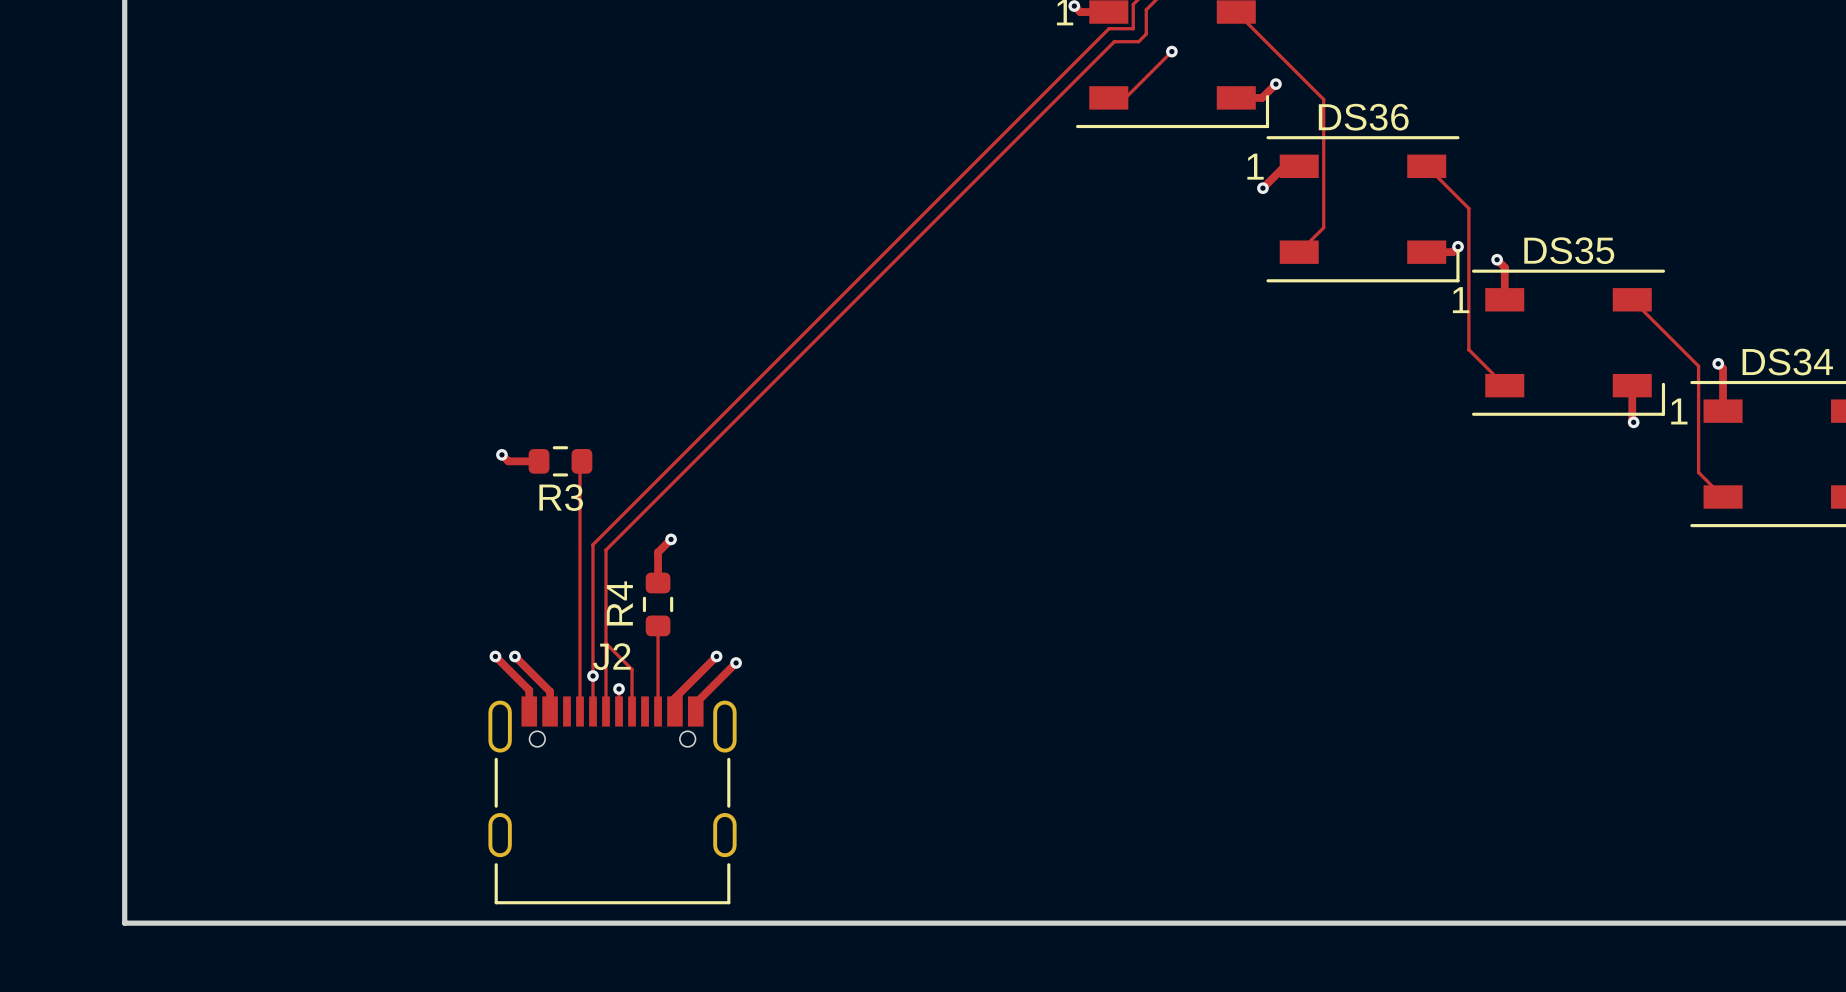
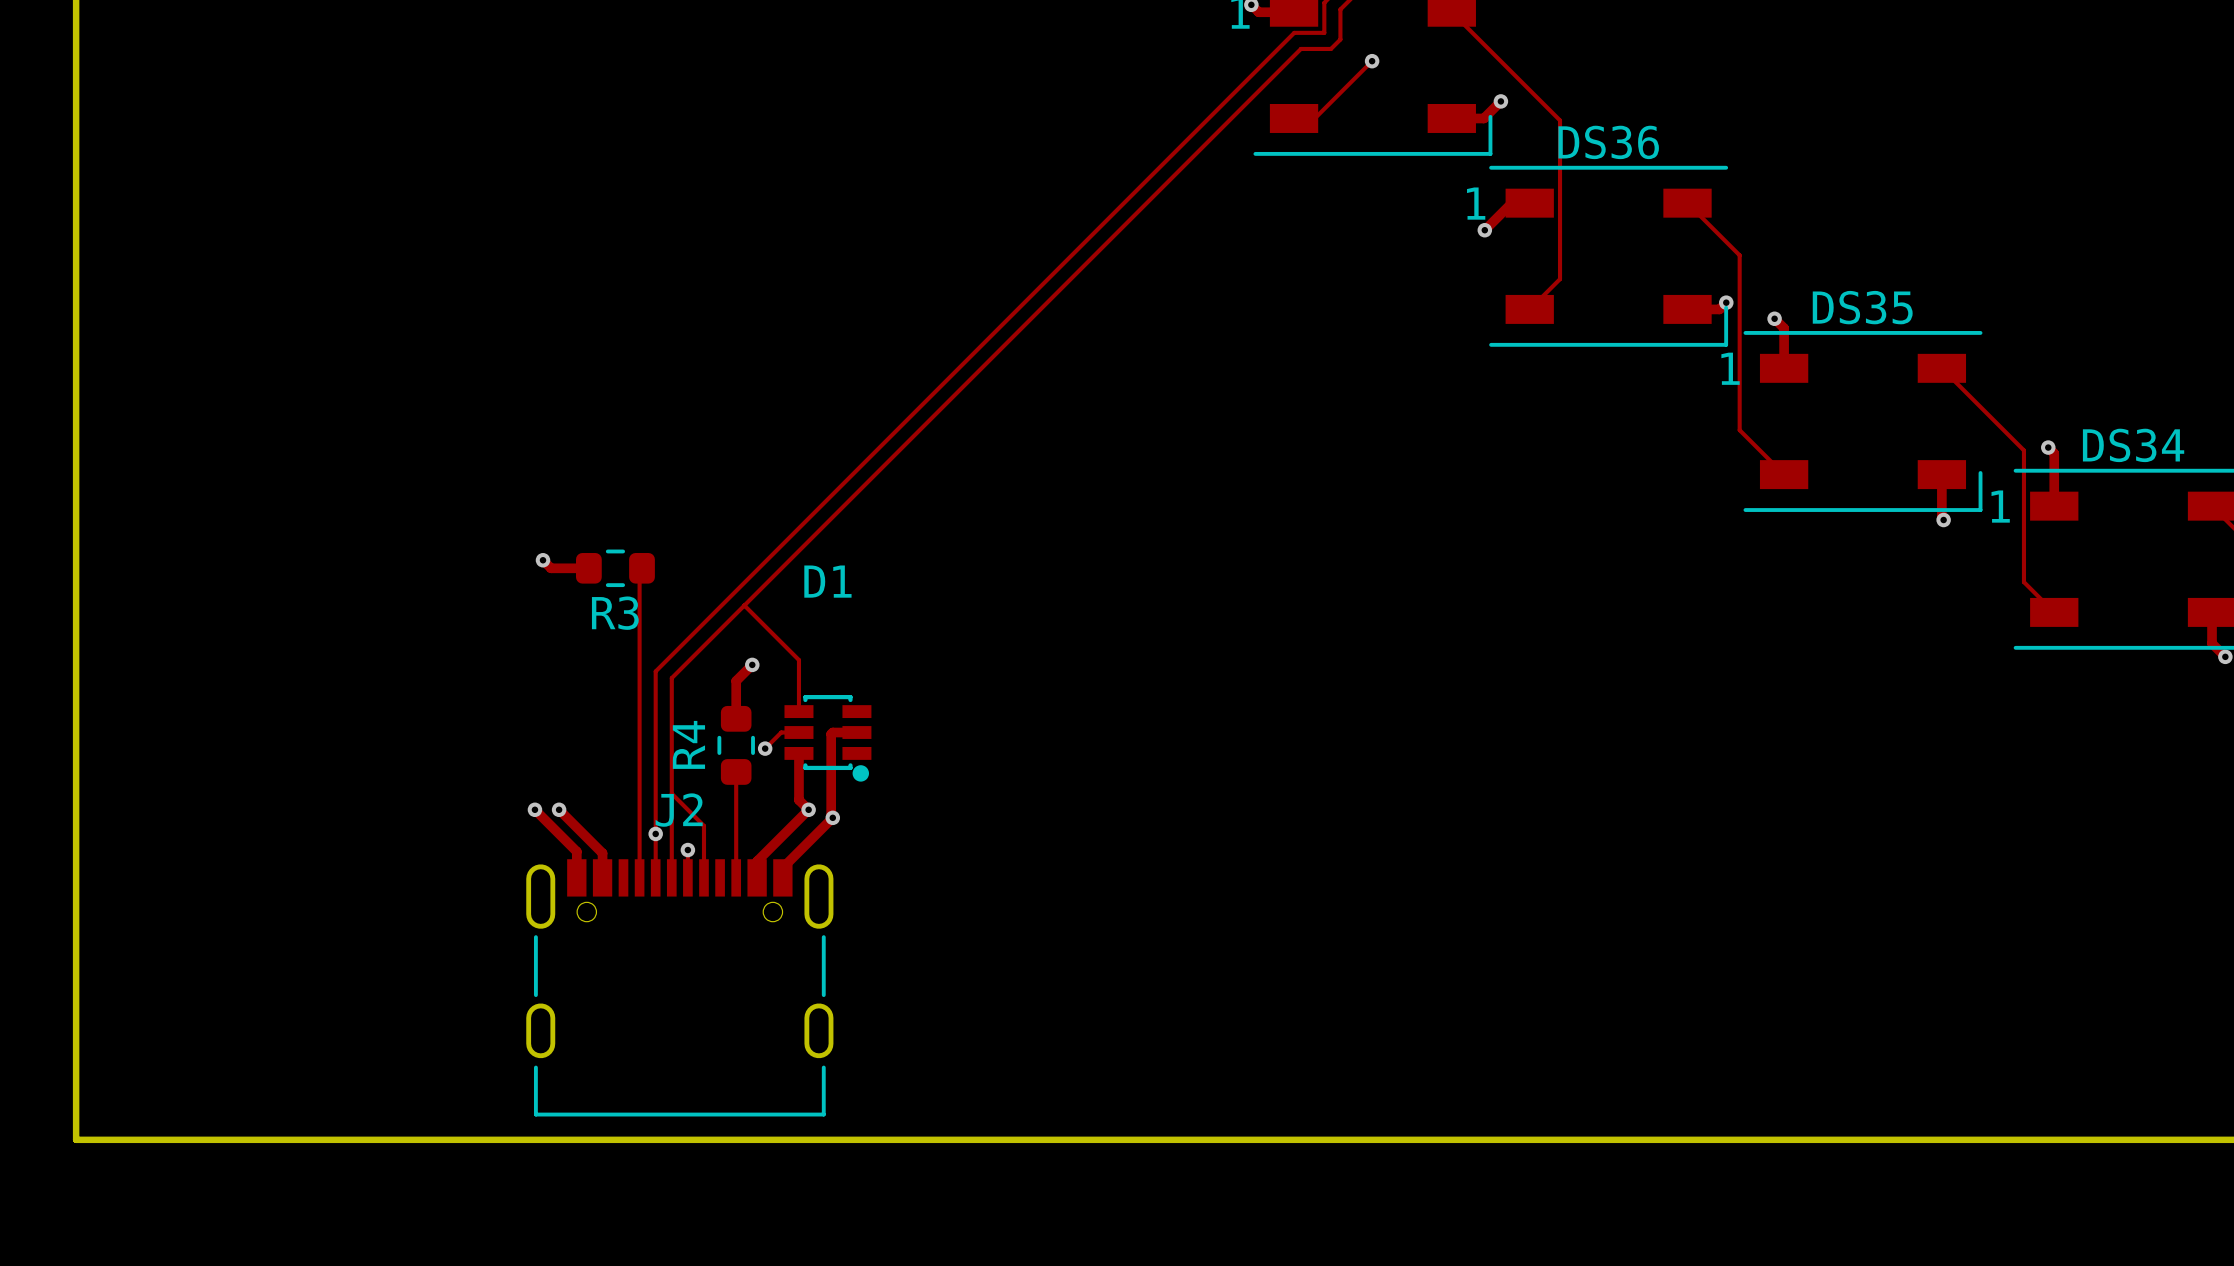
track: none -> (744, 605) (798, 660) (798, 711)
track: none -> (798, 732) (781, 732) (765, 748)
track: none -> (856, 732) (832, 732) (831, 734) (831, 816) (832, 817)
D1: none -> (827, 738)
via: none -> (765, 748)
track: none -> (798, 753) (798, 800) (808, 809)

